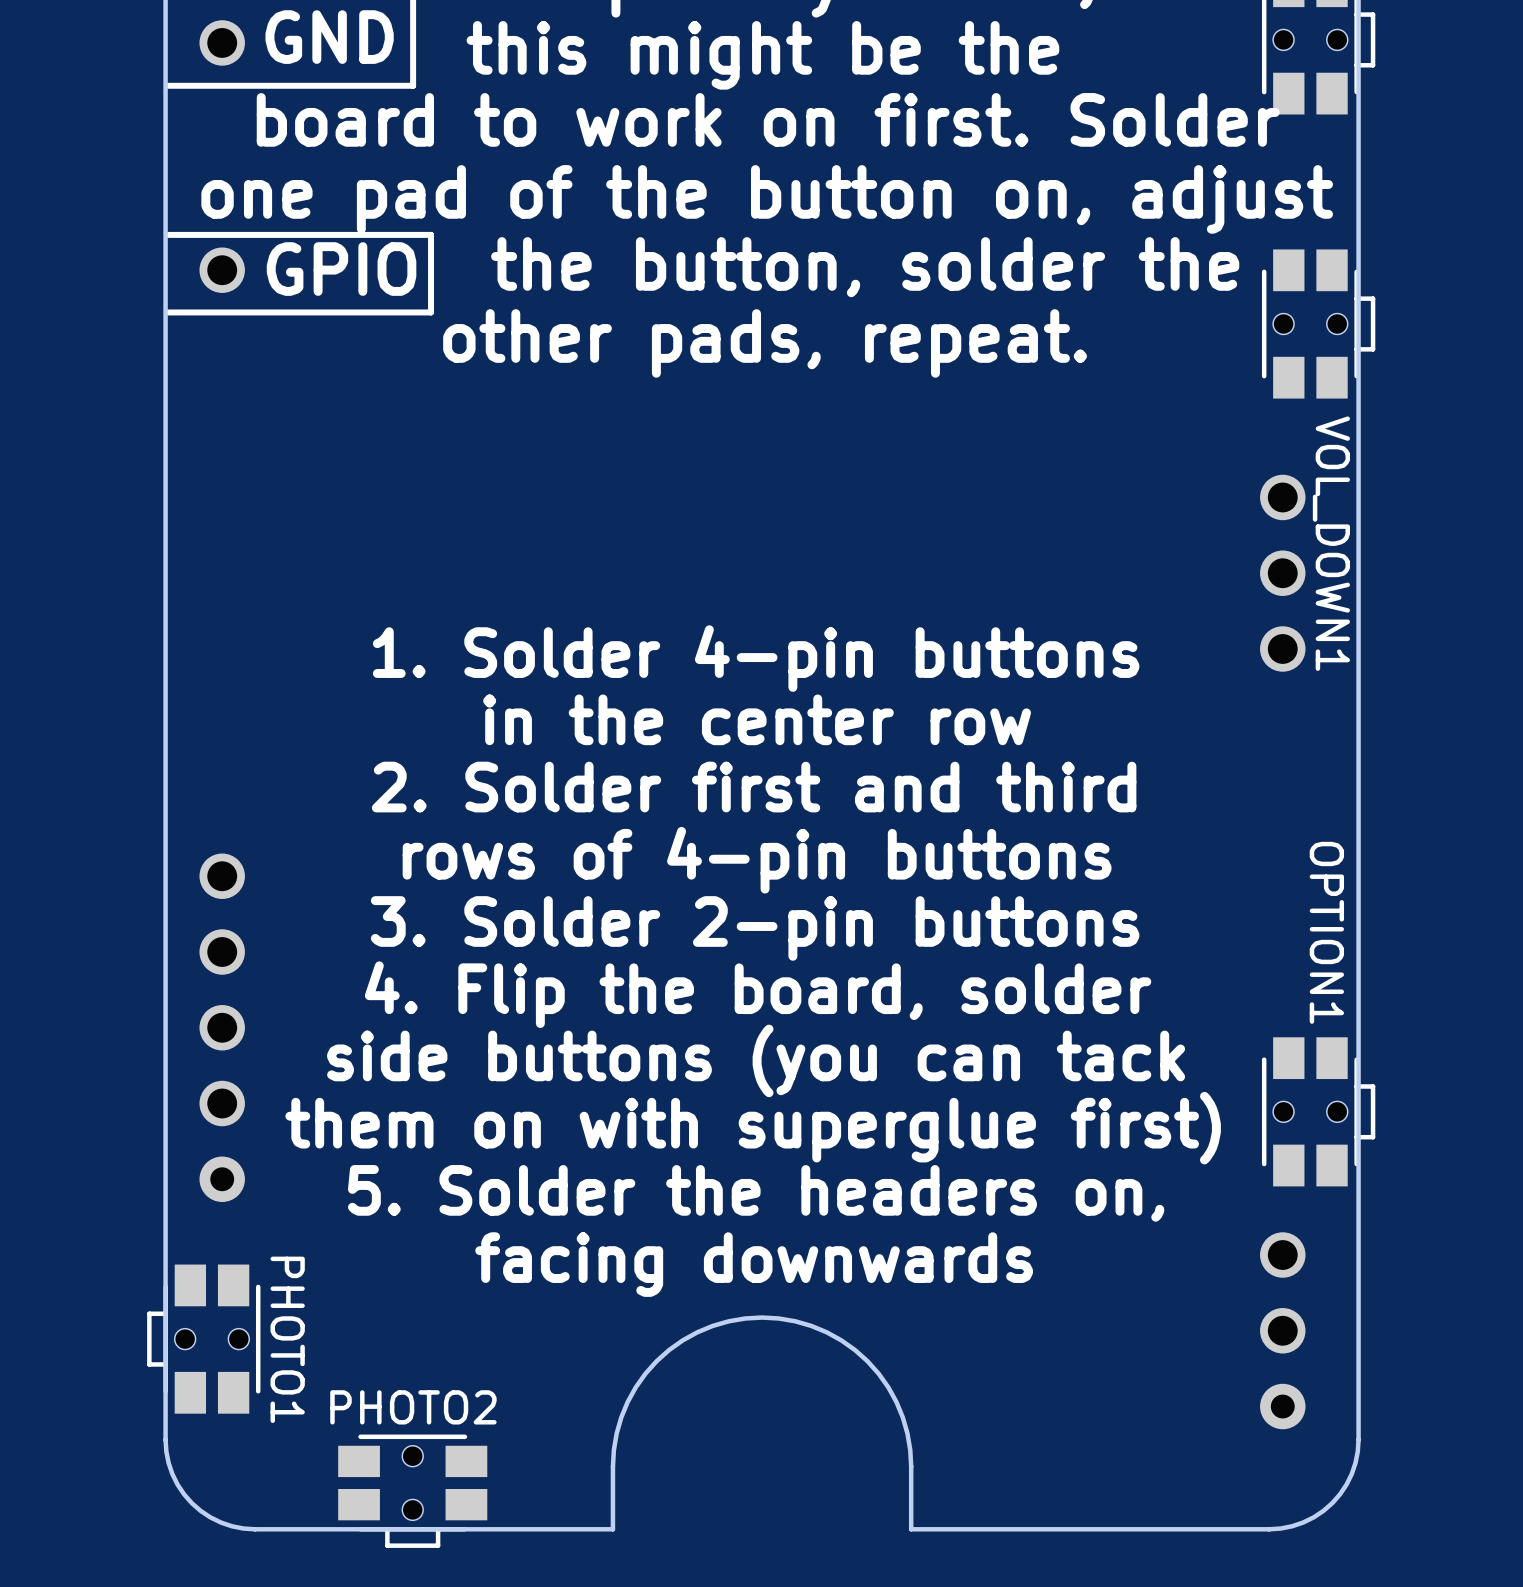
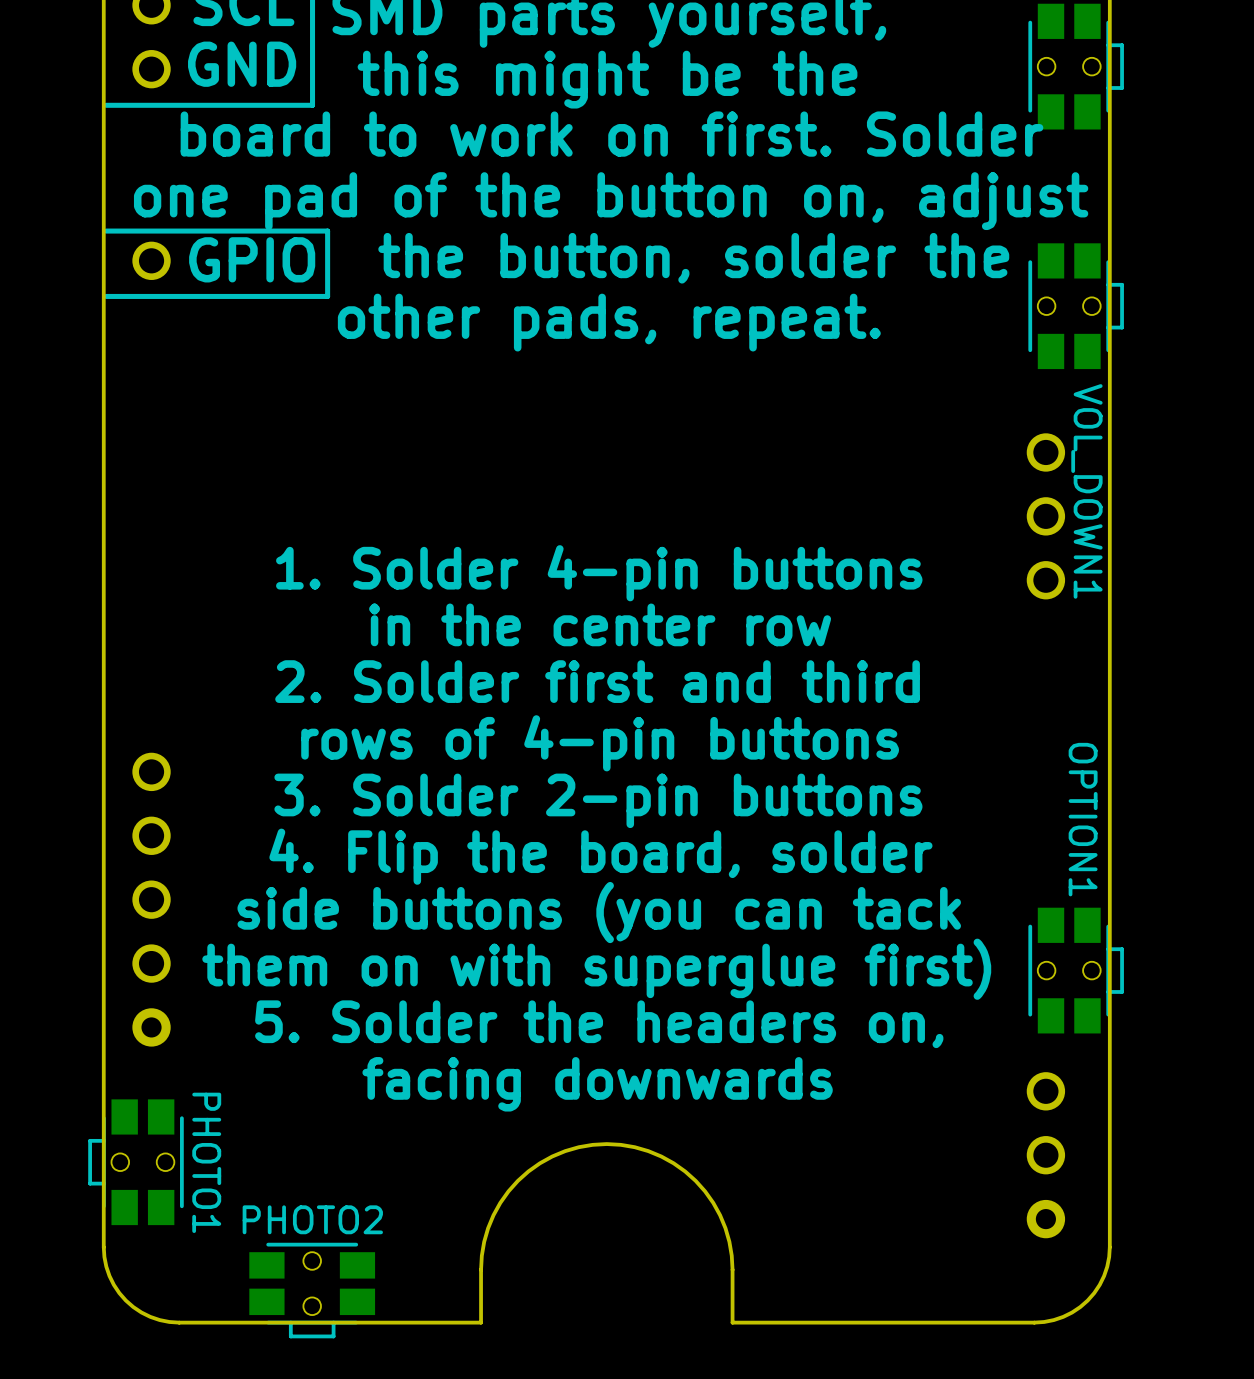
text position: 1. Solder 4-pin buttons (756, 658) -> 1. Solder 4-pin buttons (599, 573)
text position: in the center row (757, 719) -> in the center row (600, 624)
text position: 2. Solder first and third (754, 787) -> 2. Solder first and third (597, 681)
text position: rows of 4-pin buttons (757, 860) -> rows of 4-pin buttons (600, 743)
text position: 3. Solder 2-pin buttons (755, 928) -> 3. Solder 2-pin buttons (598, 800)
text position: 4. Flip the board, solder (758, 994) -> 4. Flip the board, solder (600, 856)
text position: side buttons (you can tack (756, 1060) -> side buttons (you can tack (599, 912)
text position: them on with superglue first) (753, 1128) -> them on with superglue first) (596, 969)
text position: 5. Solder the headers on, (756, 1193) -> 5. Solder the headers on, (599, 1024)
text position: facing downwards (754, 1264) -> facing downwards (597, 1084)

